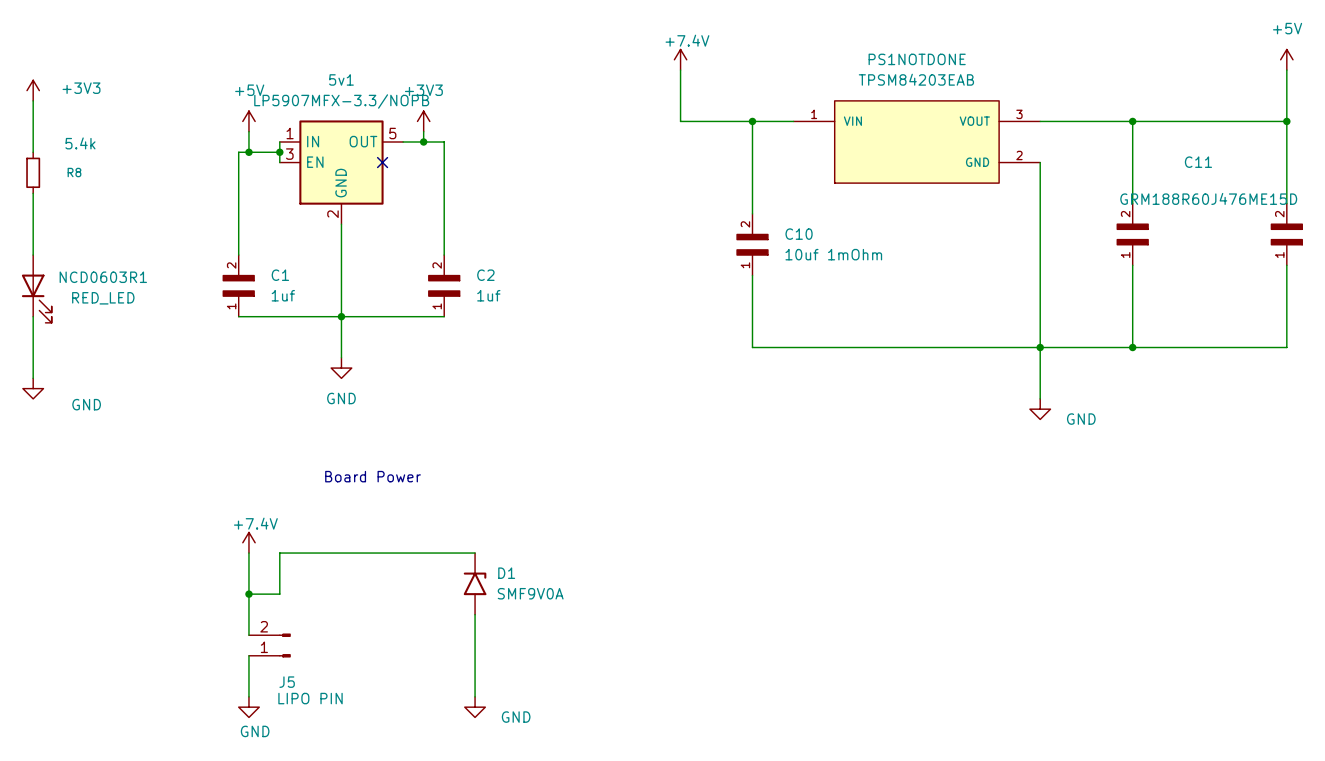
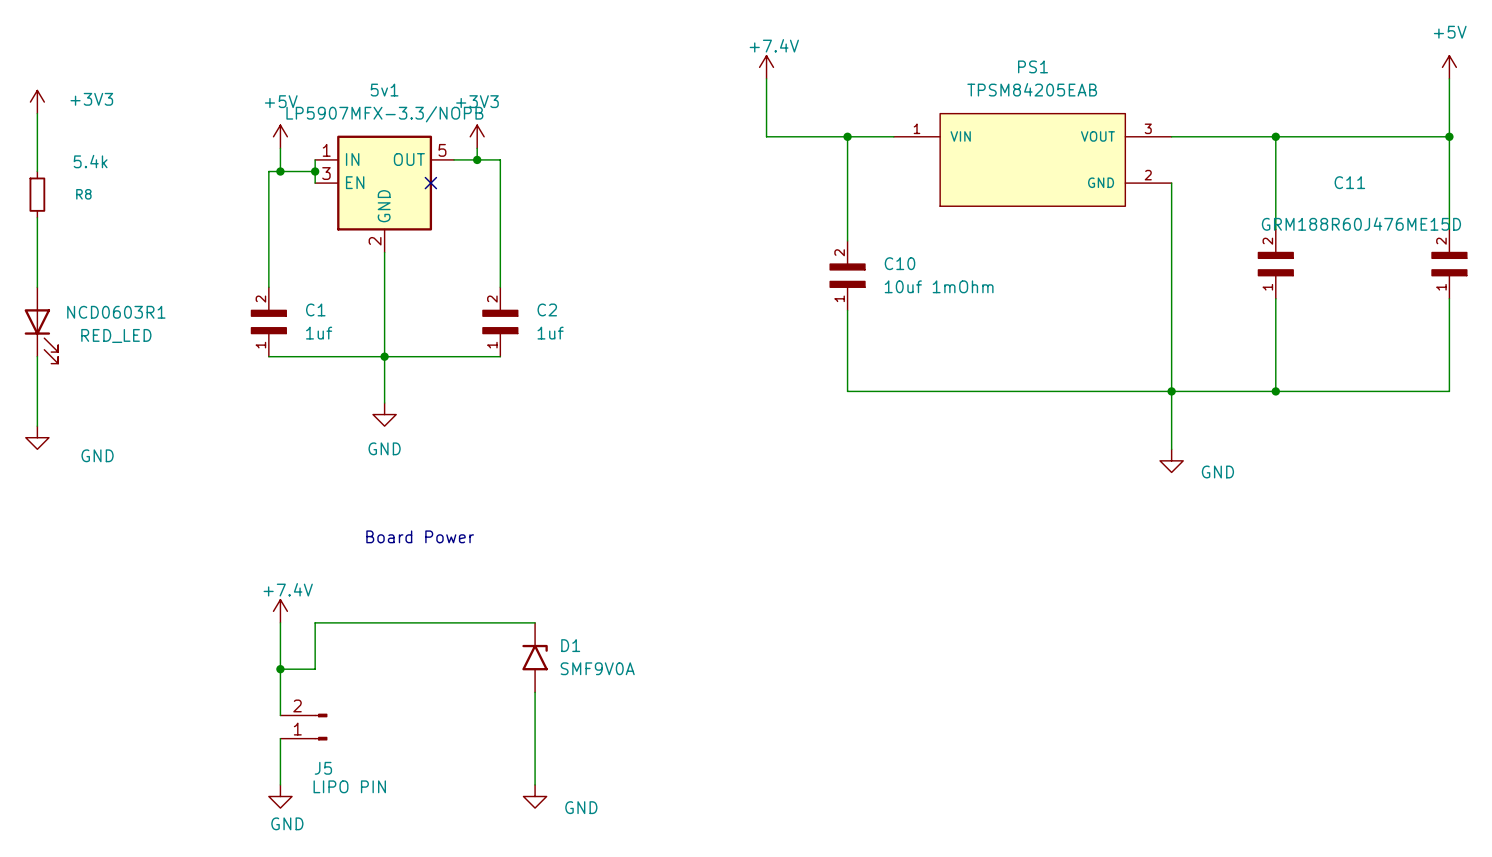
PS1NOTDONE name: PS1NOTDONE (917, 59) -> PS1 (1033, 66)
PS1NOTDONE value: TPSM84203EAB (916, 79) -> TPSM84205EAB (1032, 89)

